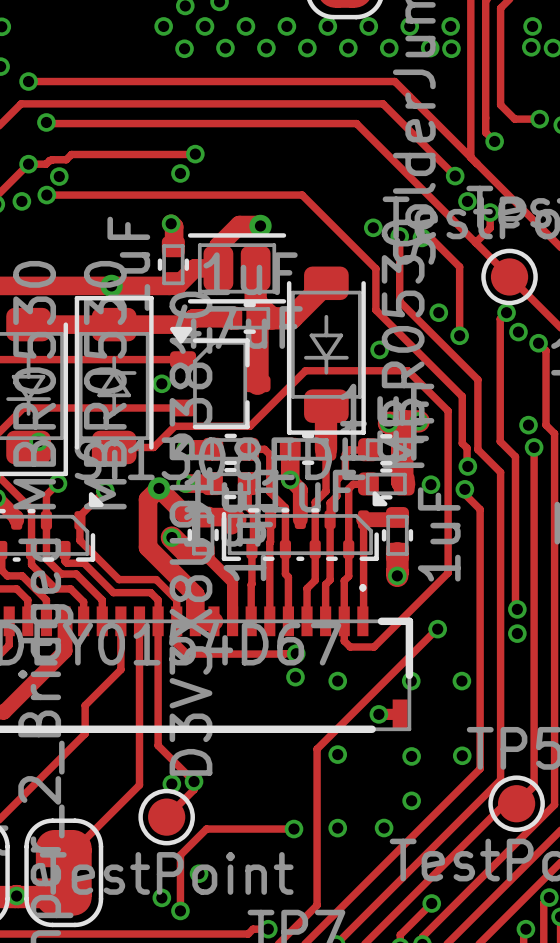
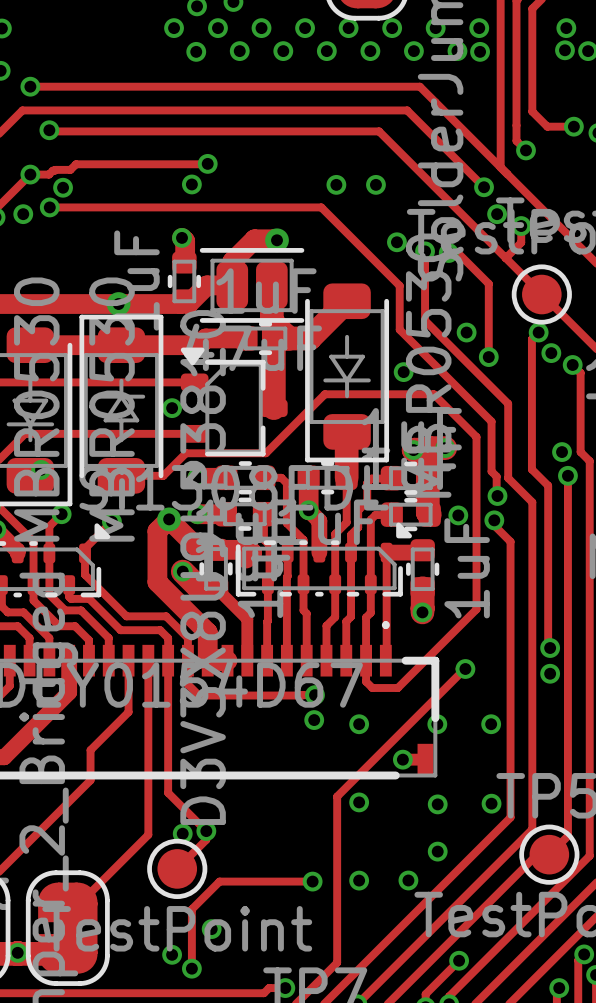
via: none -> (336, 184)
via: none -> (375, 184)

